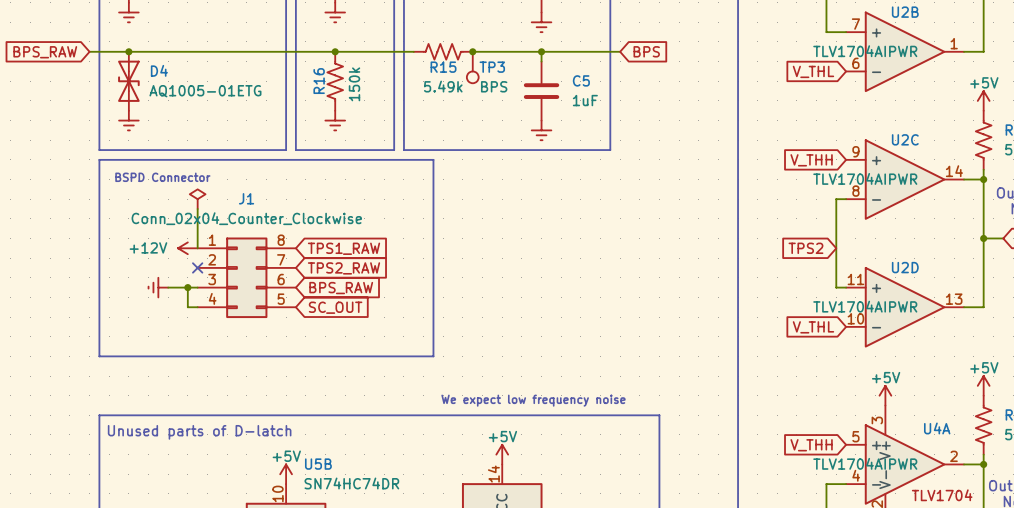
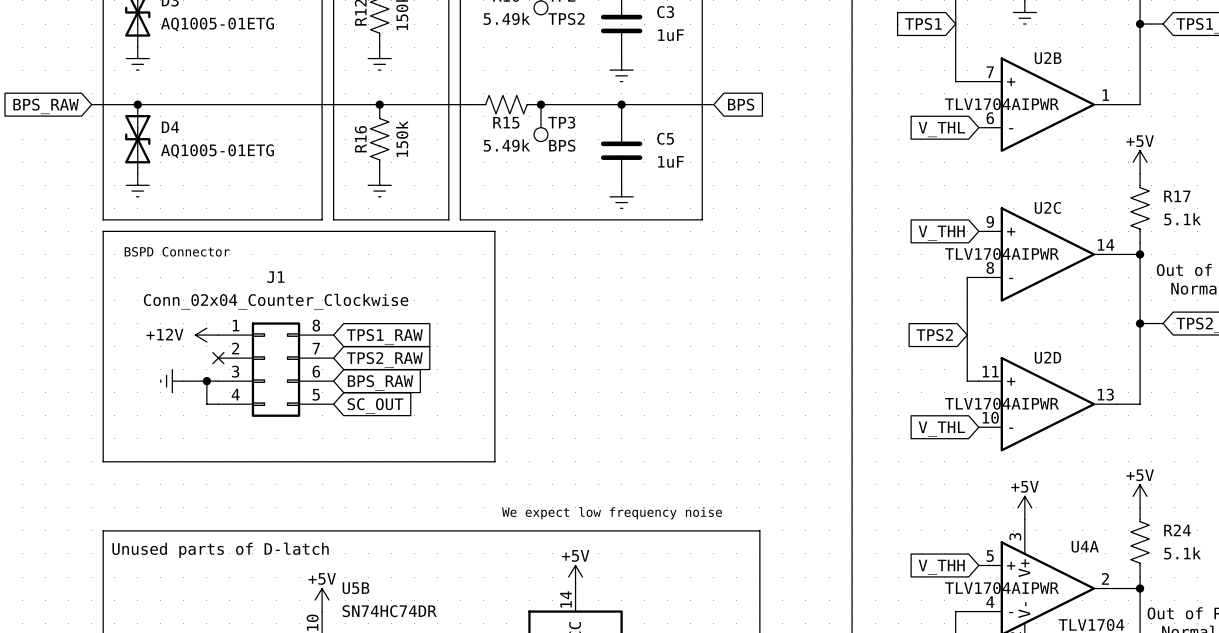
power symbol: (197, 199) -> none
wire: (197, 209) (197, 248) -> none

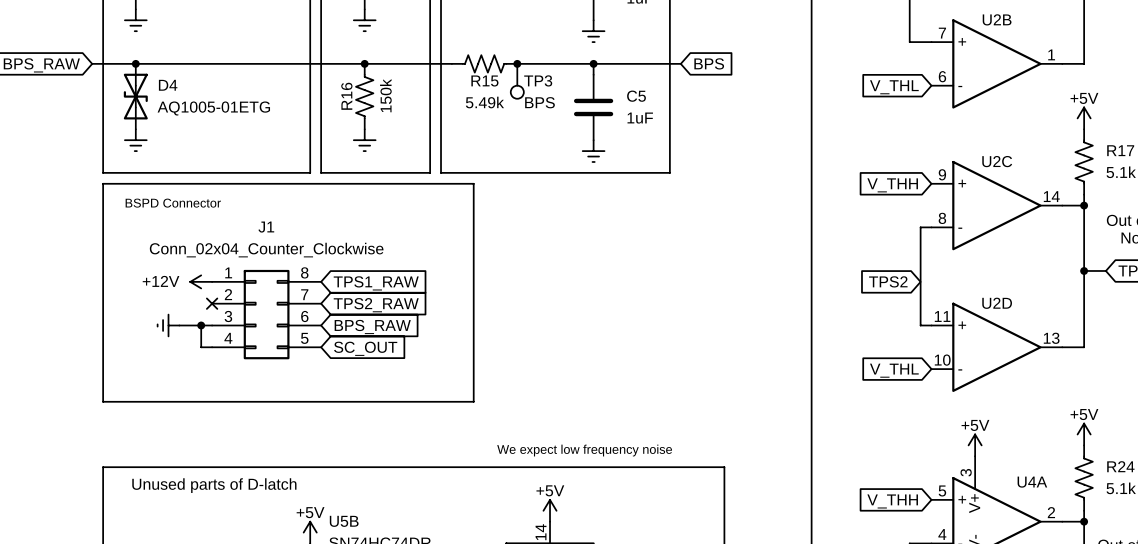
U2B value: TLV1704AIPWR (1001, 104) -> none
U2C value: TLV1704AIPWR (1001, 254) -> none
U2D value: TLV1704AIPWR (1001, 403) -> none
U4A value: TLV1704AIPWR (1001, 588) -> none

